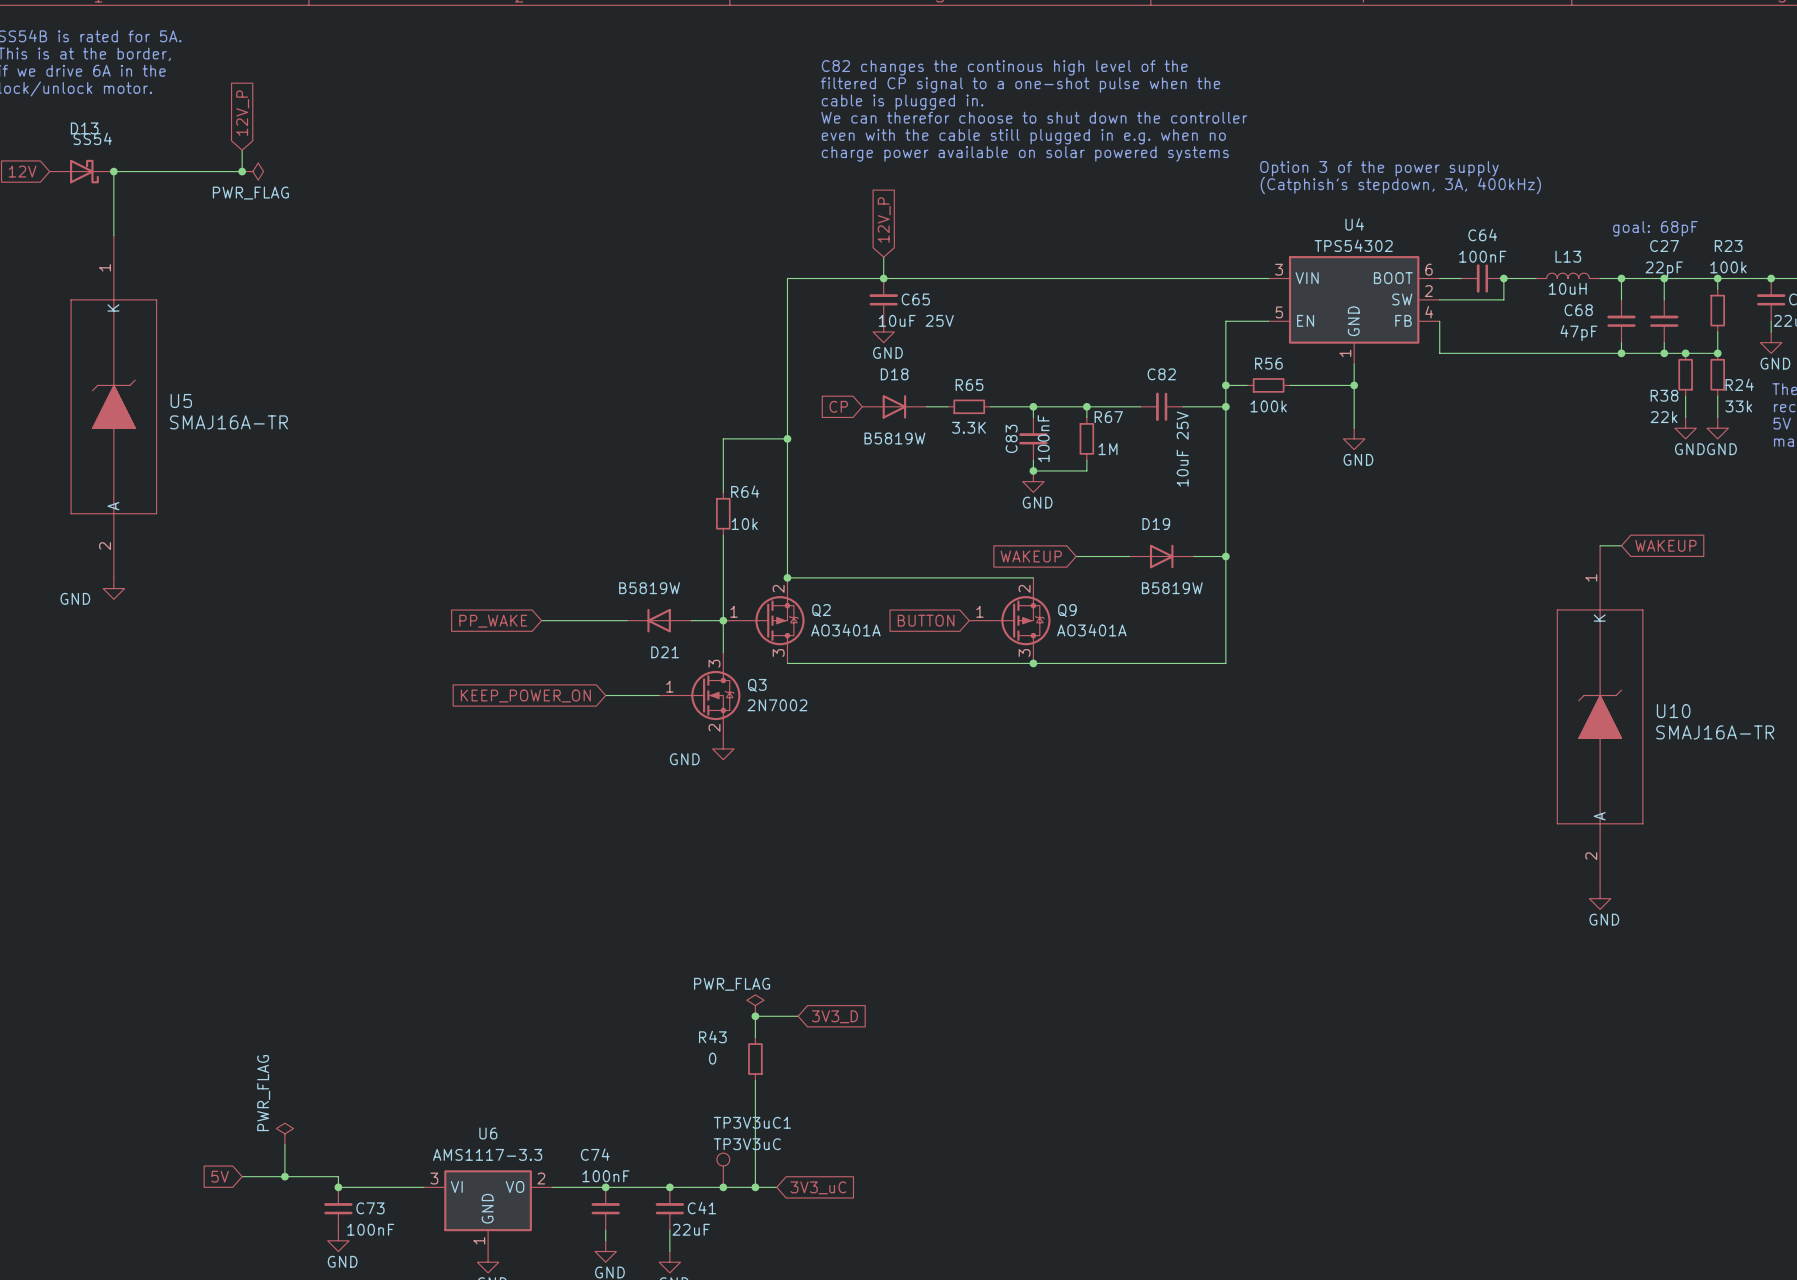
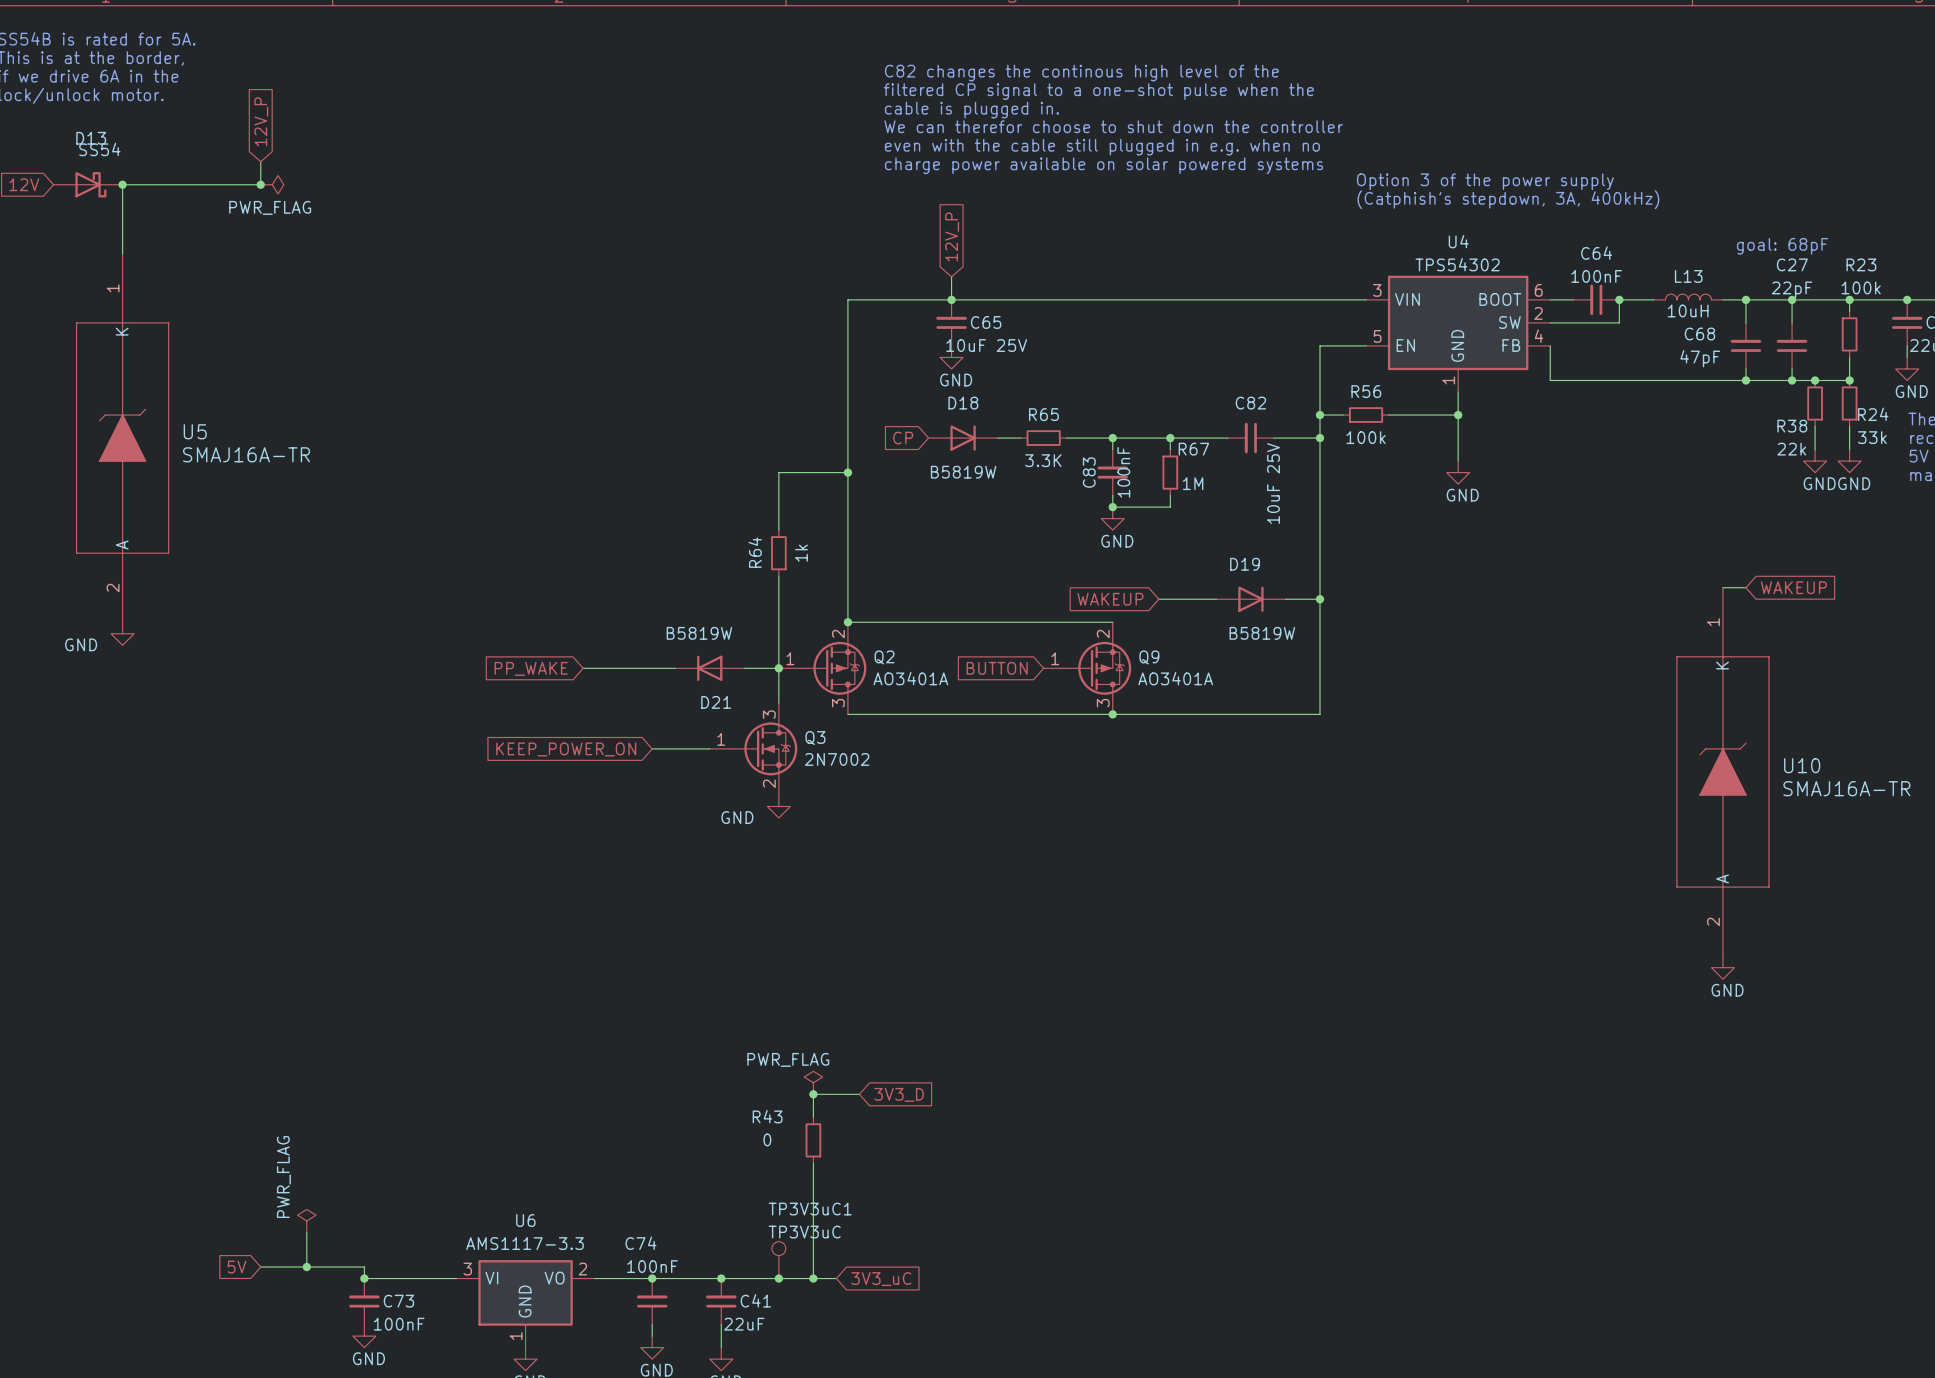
R64 name rotation: 0° (745, 491) -> 90° counterclockwise (755, 552)
R64 name position: R64 (745, 491) -> R64 (755, 552)
R64 value: 10k (744, 524) -> 1k (801, 553)

